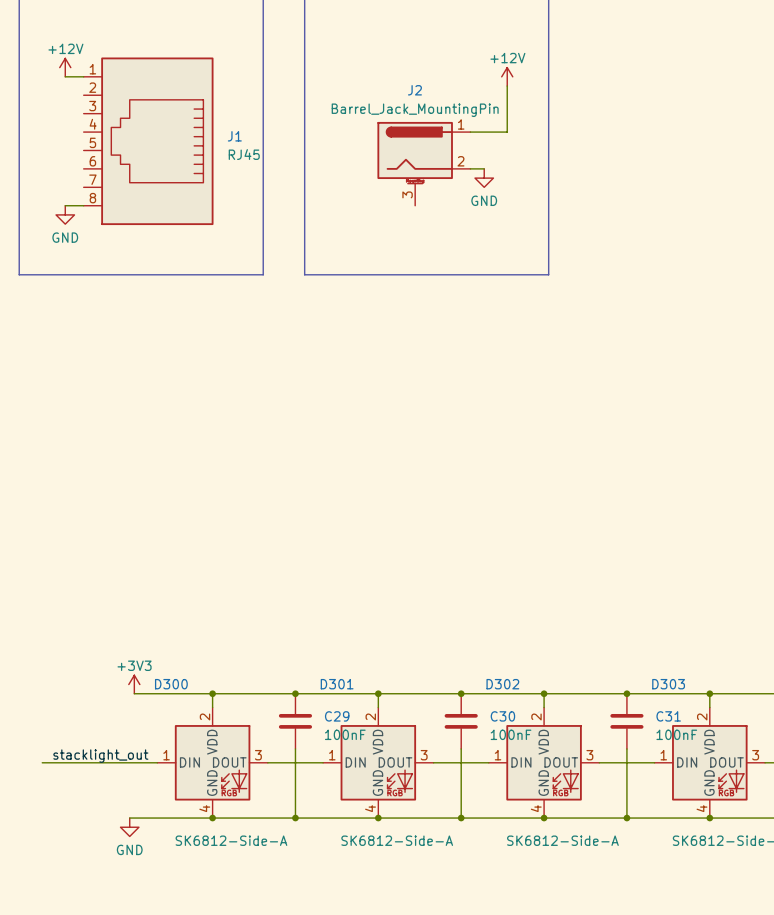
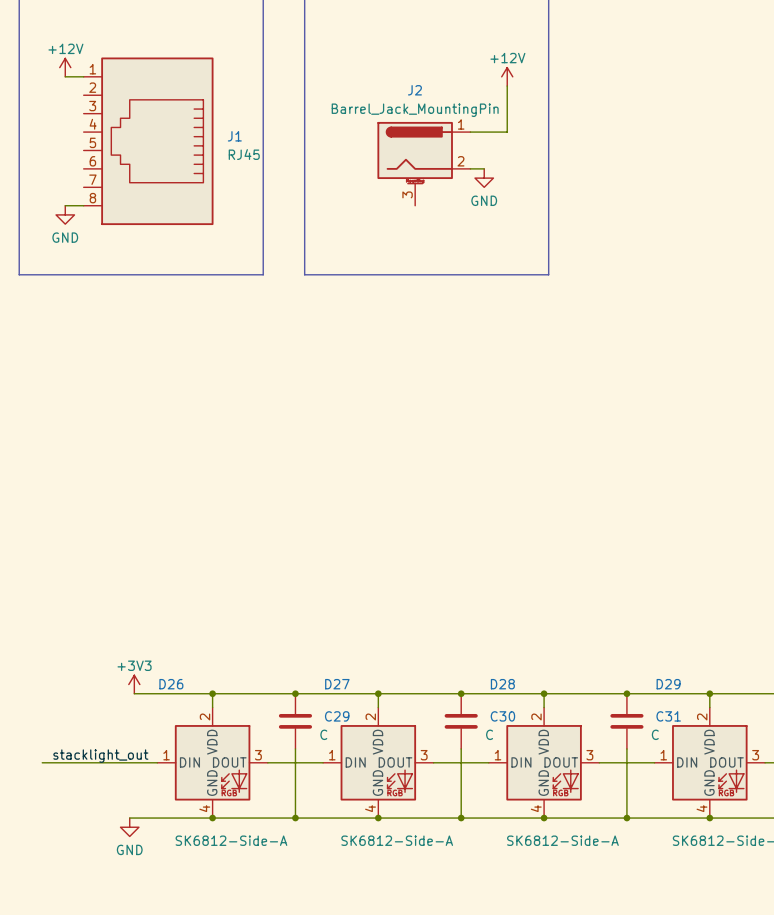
D300 name: D300 (171, 684) -> D26 (171, 684)
D301 name: D301 (337, 684) -> D27 (337, 684)
D302 name: D302 (502, 684) -> D28 (502, 684)
D303 name: D303 (668, 684) -> D29 (668, 684)
C29 value: 100nF (345, 734) -> C (323, 734)
C30 value: 100nF (511, 734) -> C (489, 734)
C31 value: 100nF (676, 734) -> C (655, 734)

